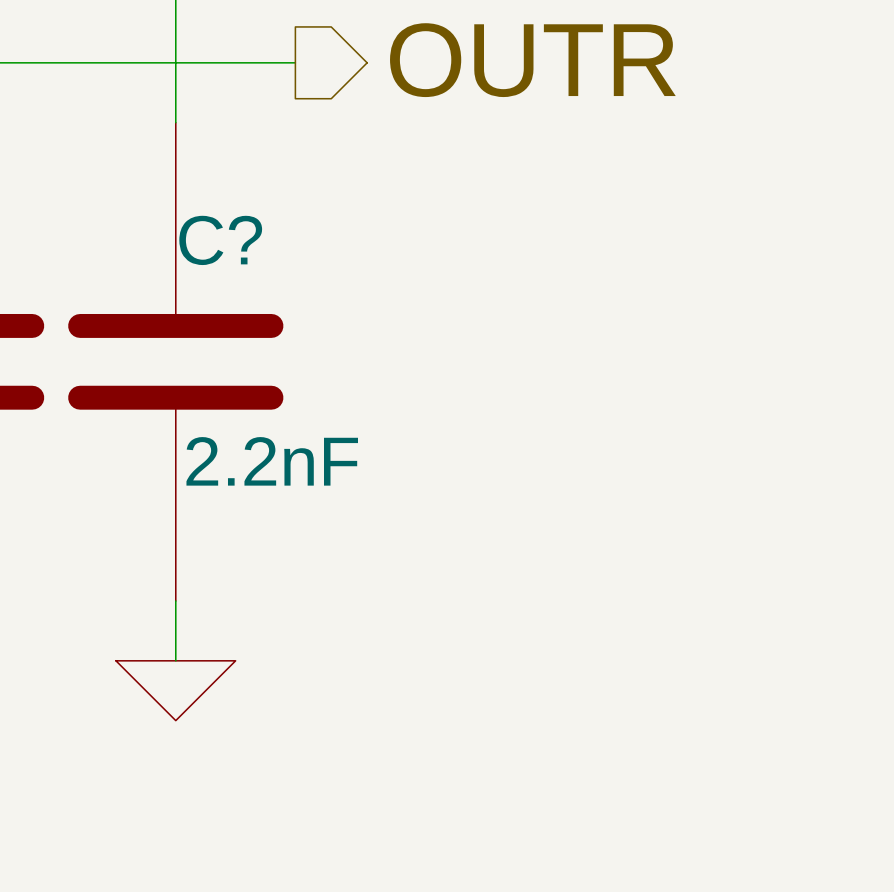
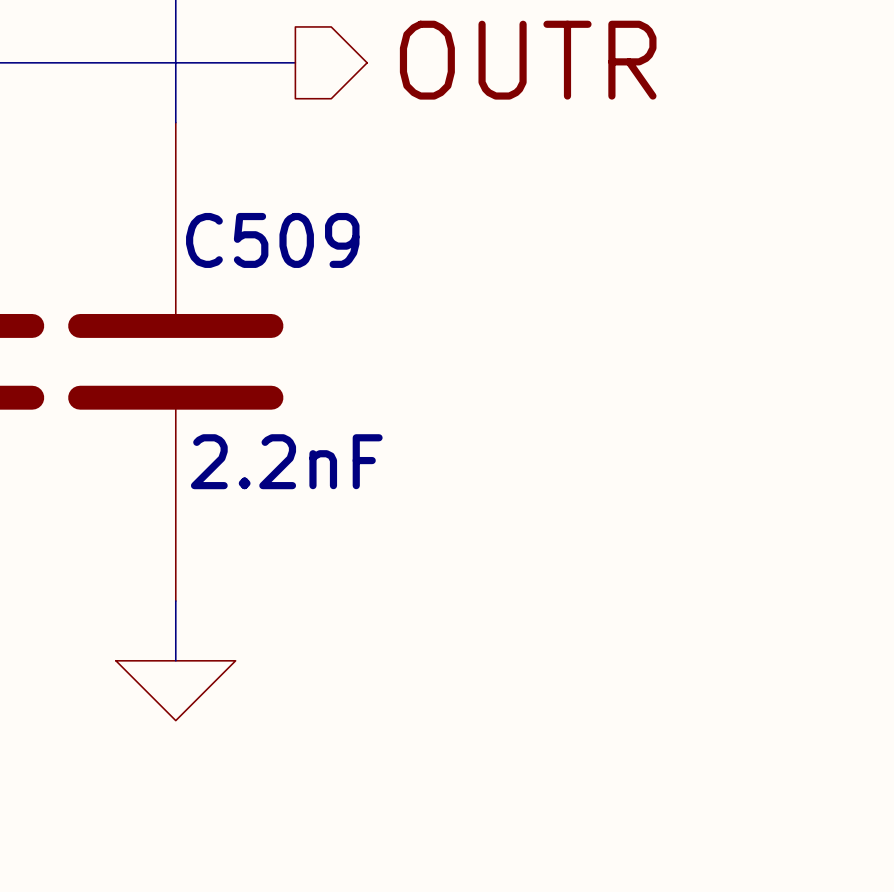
C? name: C? (220, 240) -> C509 (272, 240)

